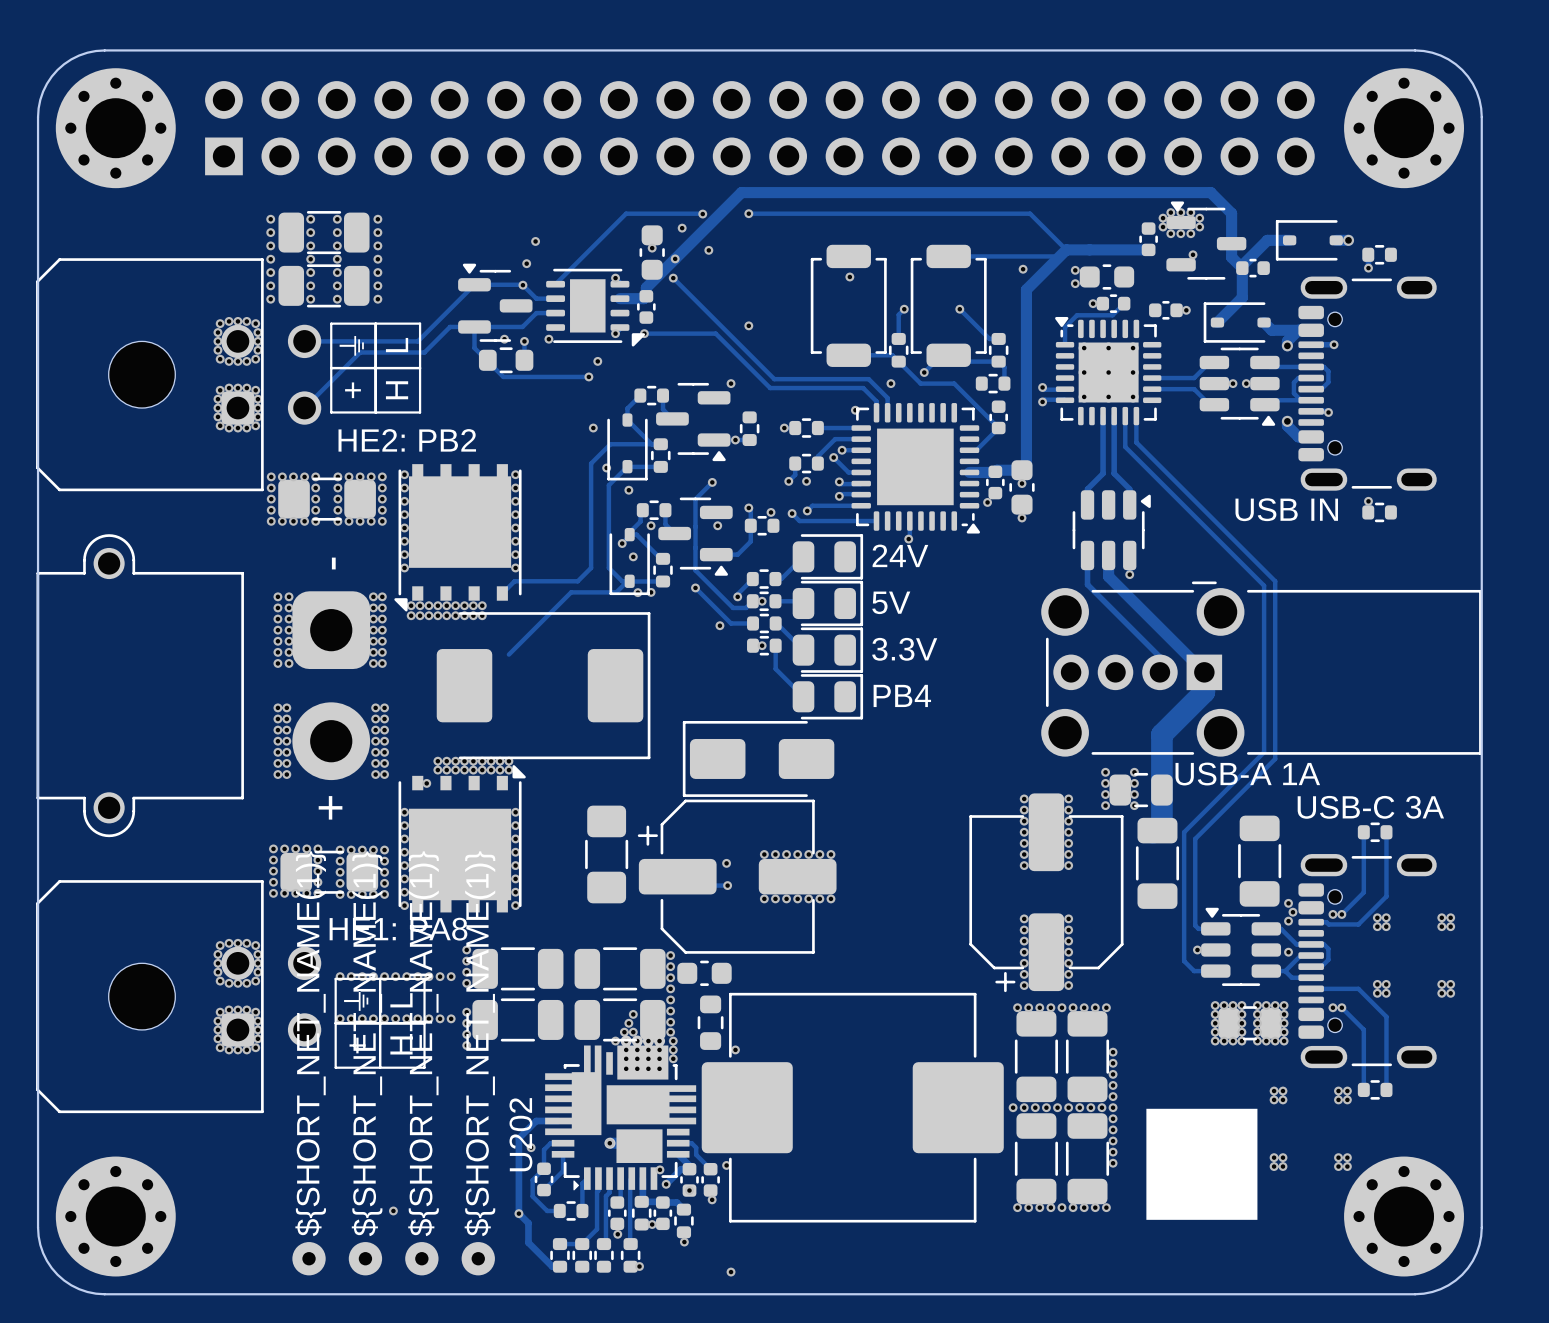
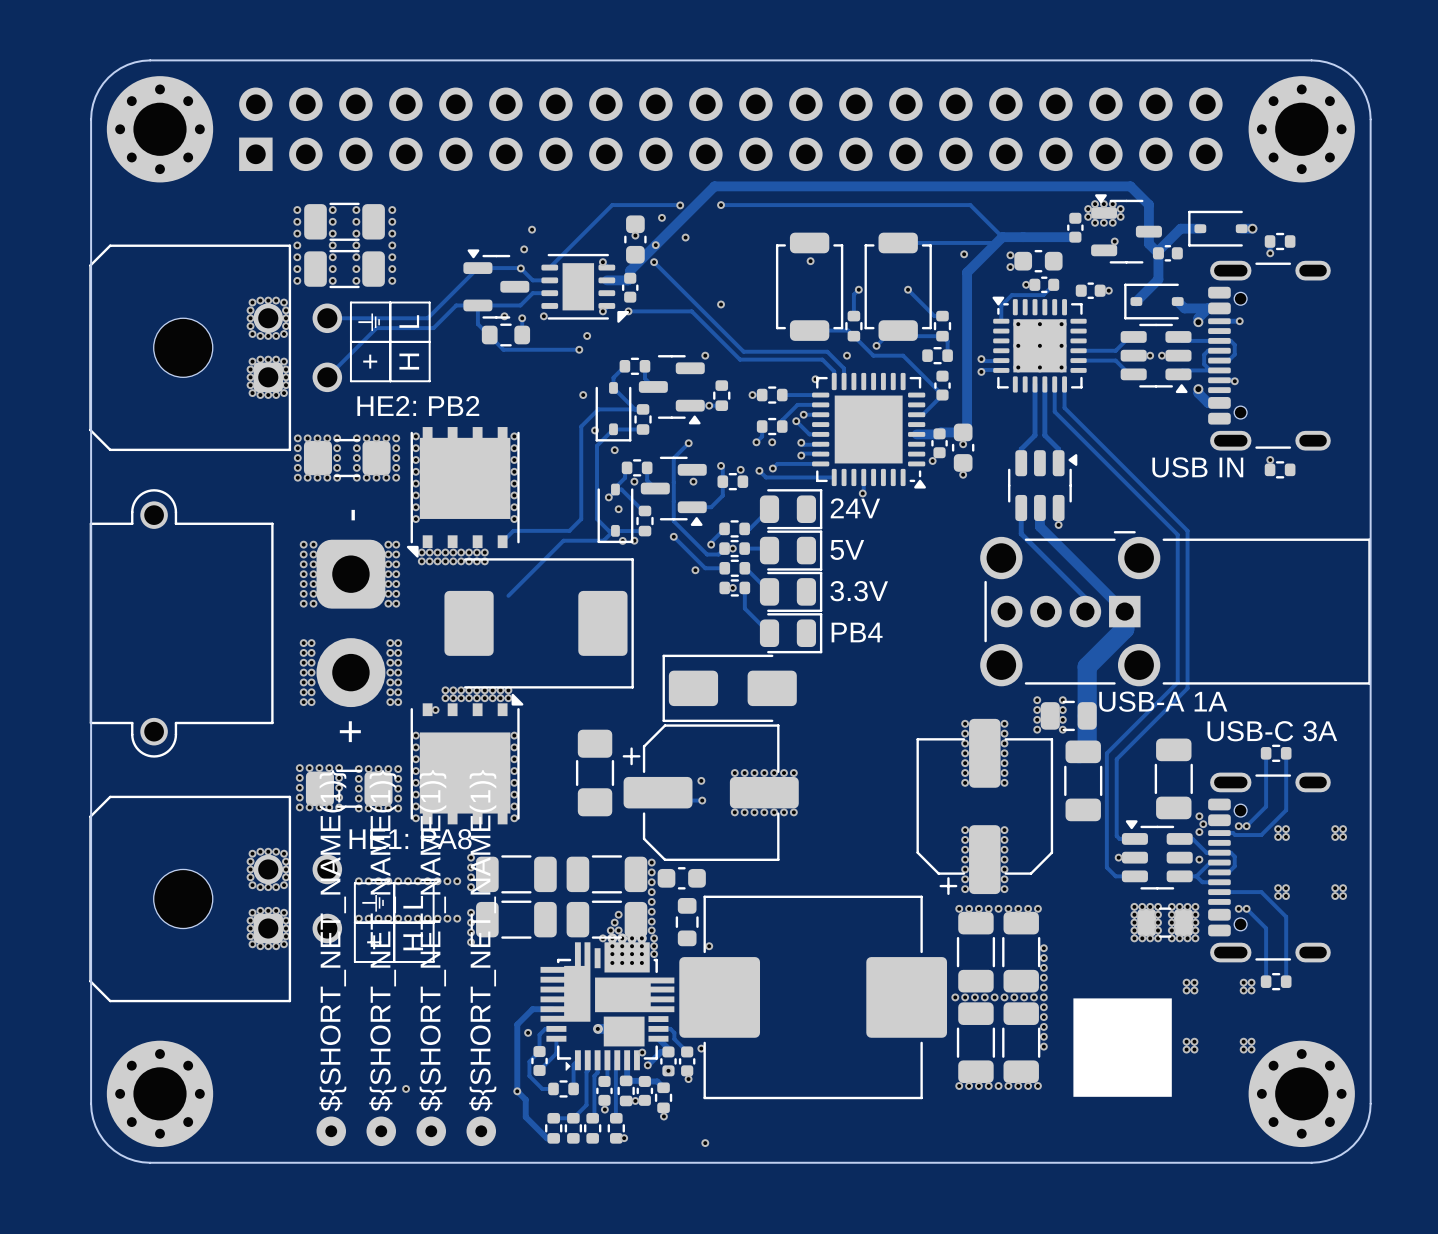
U202 name: U202 (520, 1134) -> none

